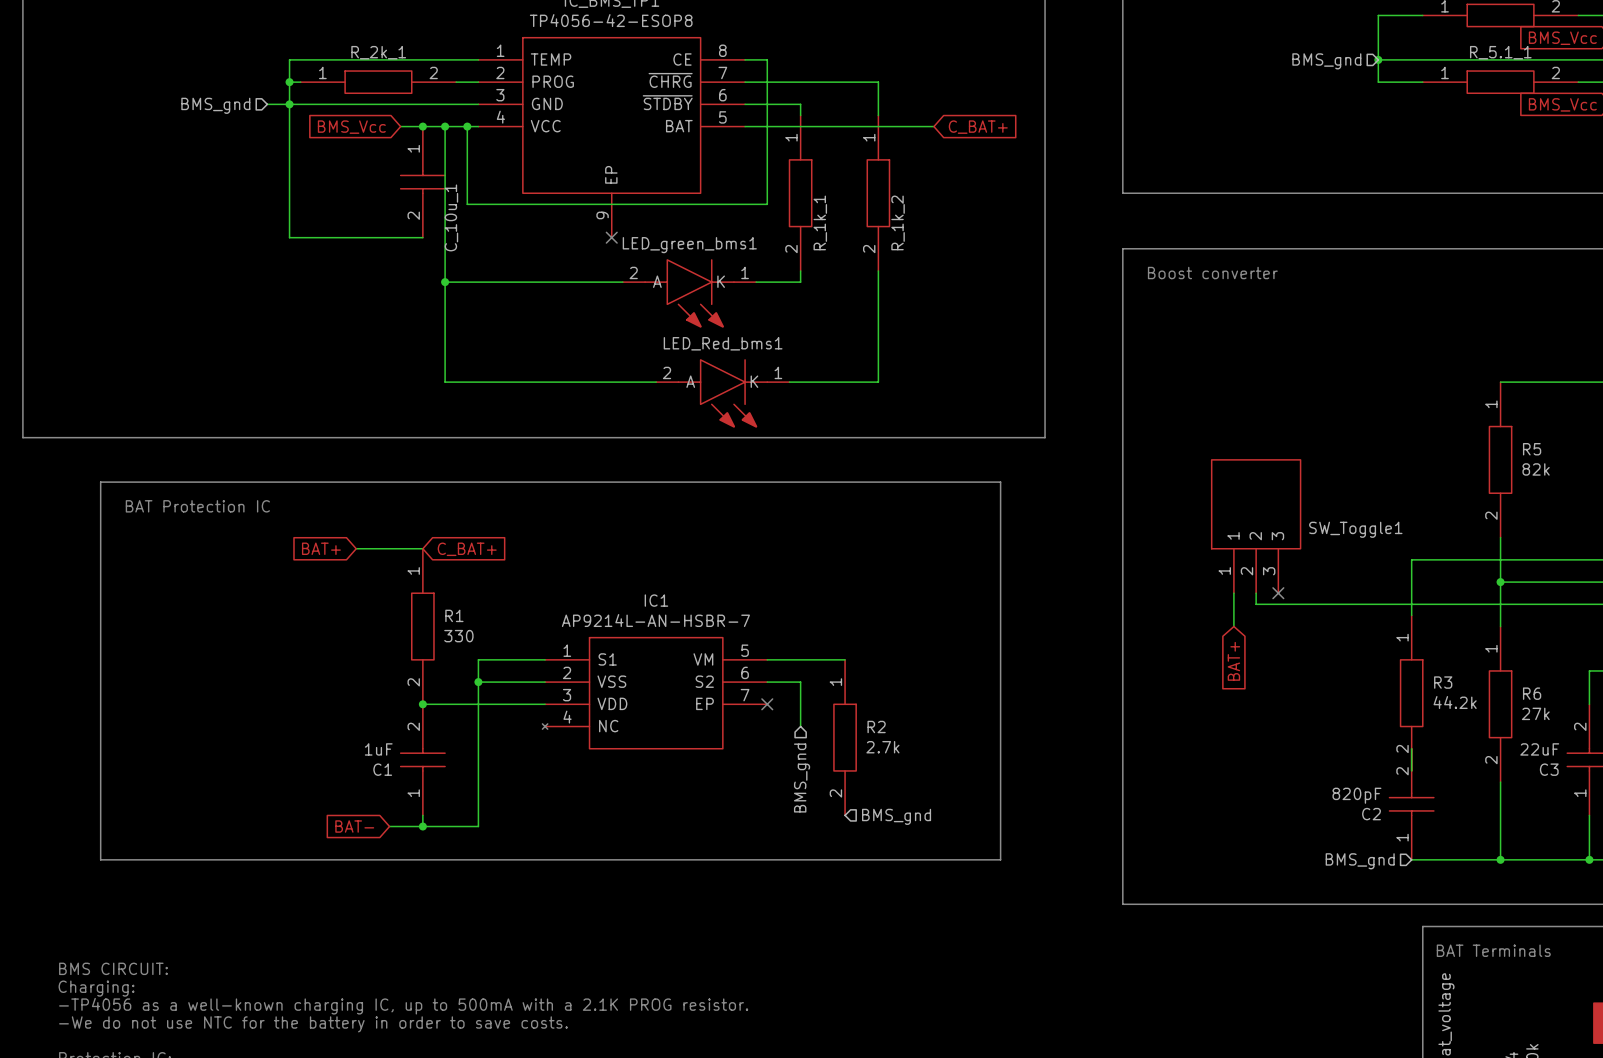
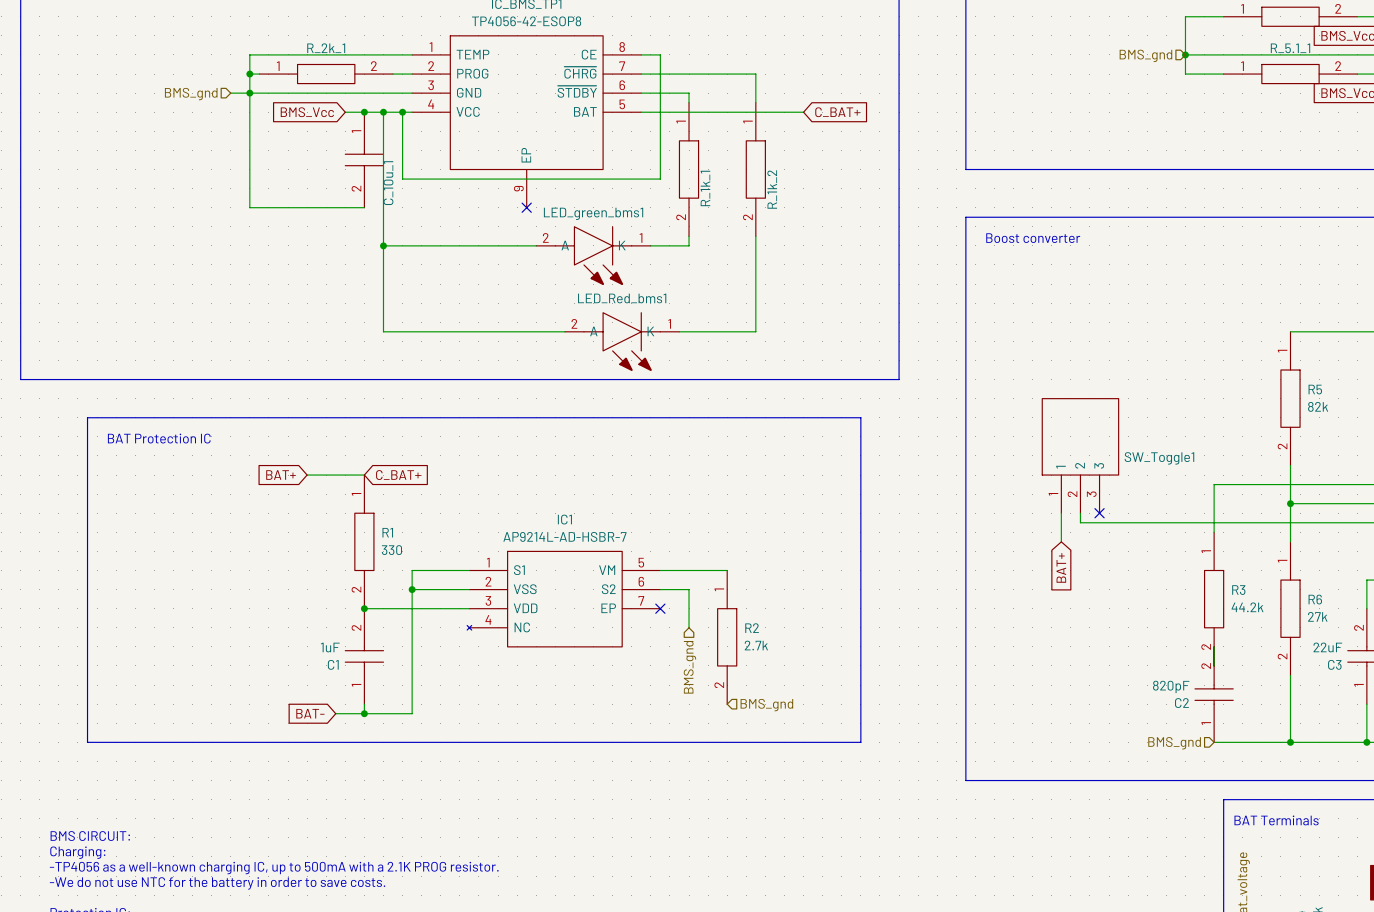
IC1 value: AP9214L-AN-HSBR-7 (655, 620) -> AP9214L-AD-HSBR-7 (564, 536)

